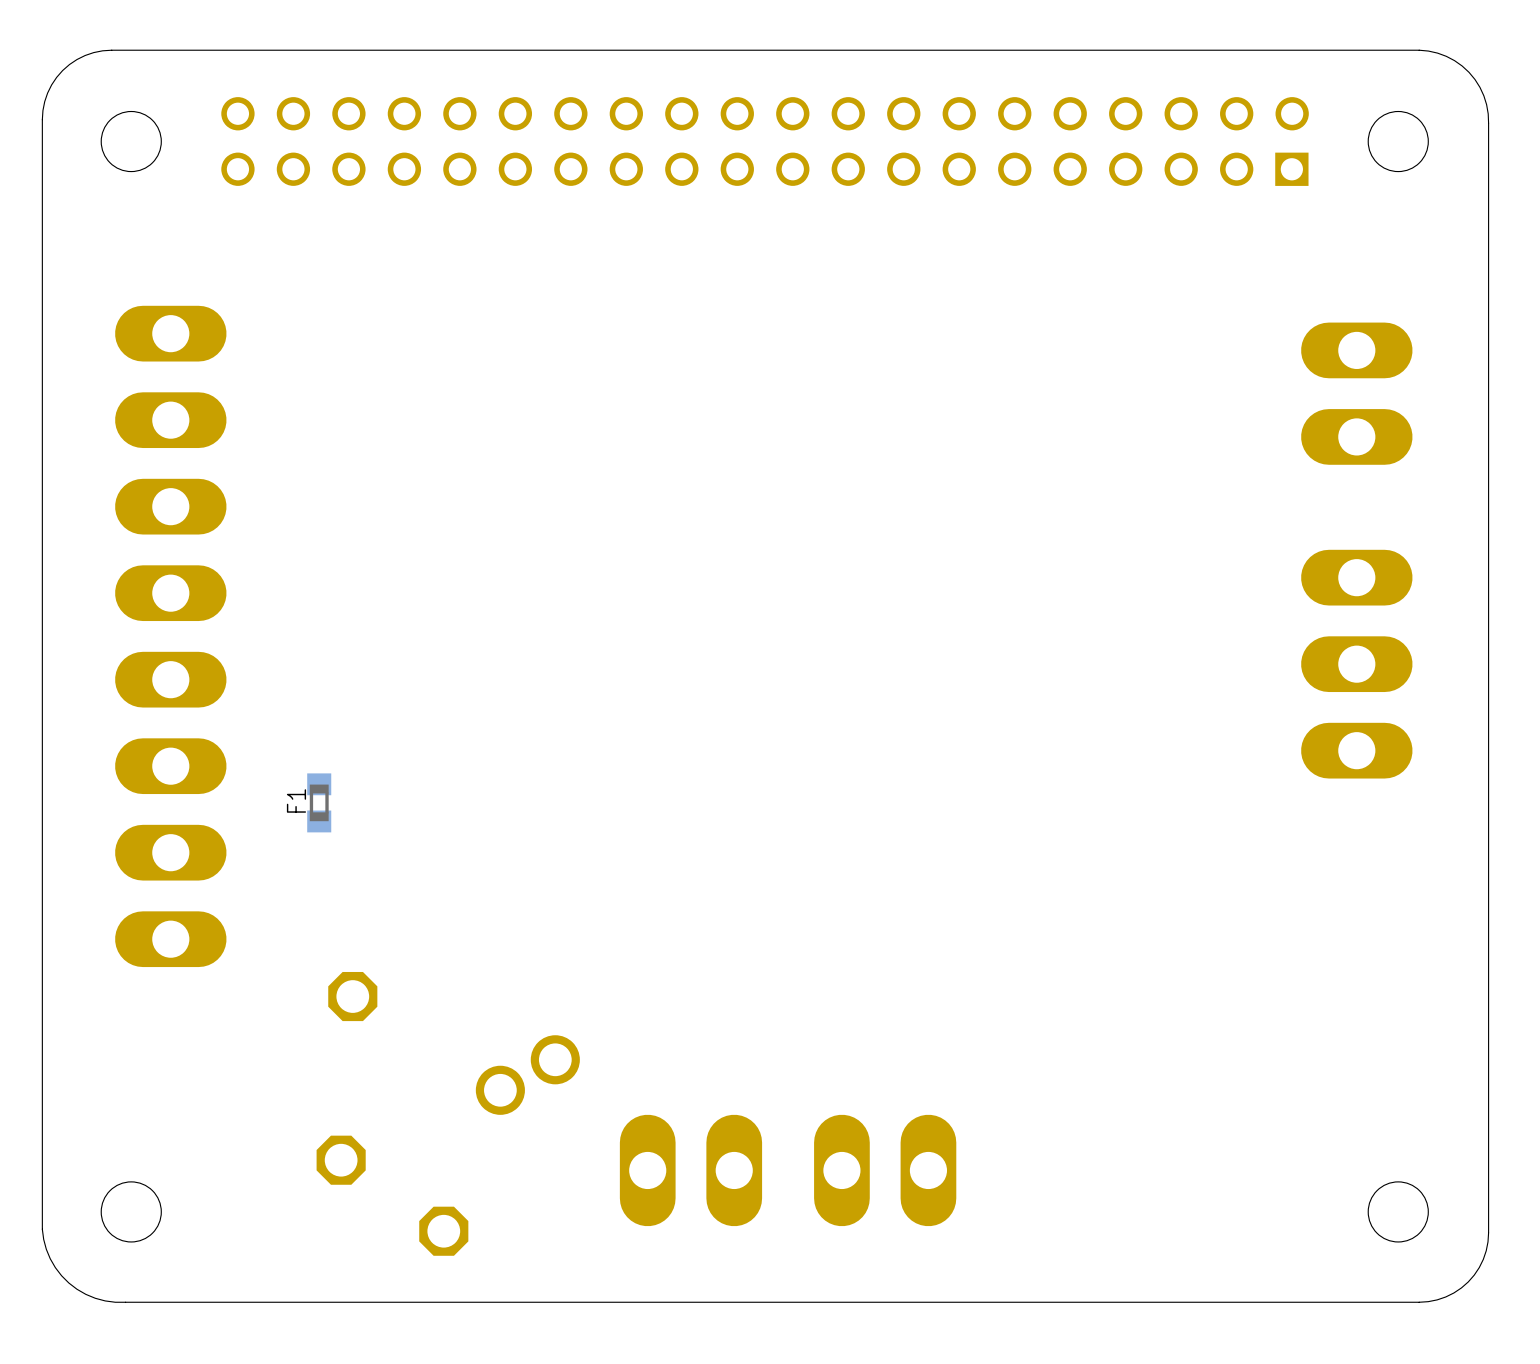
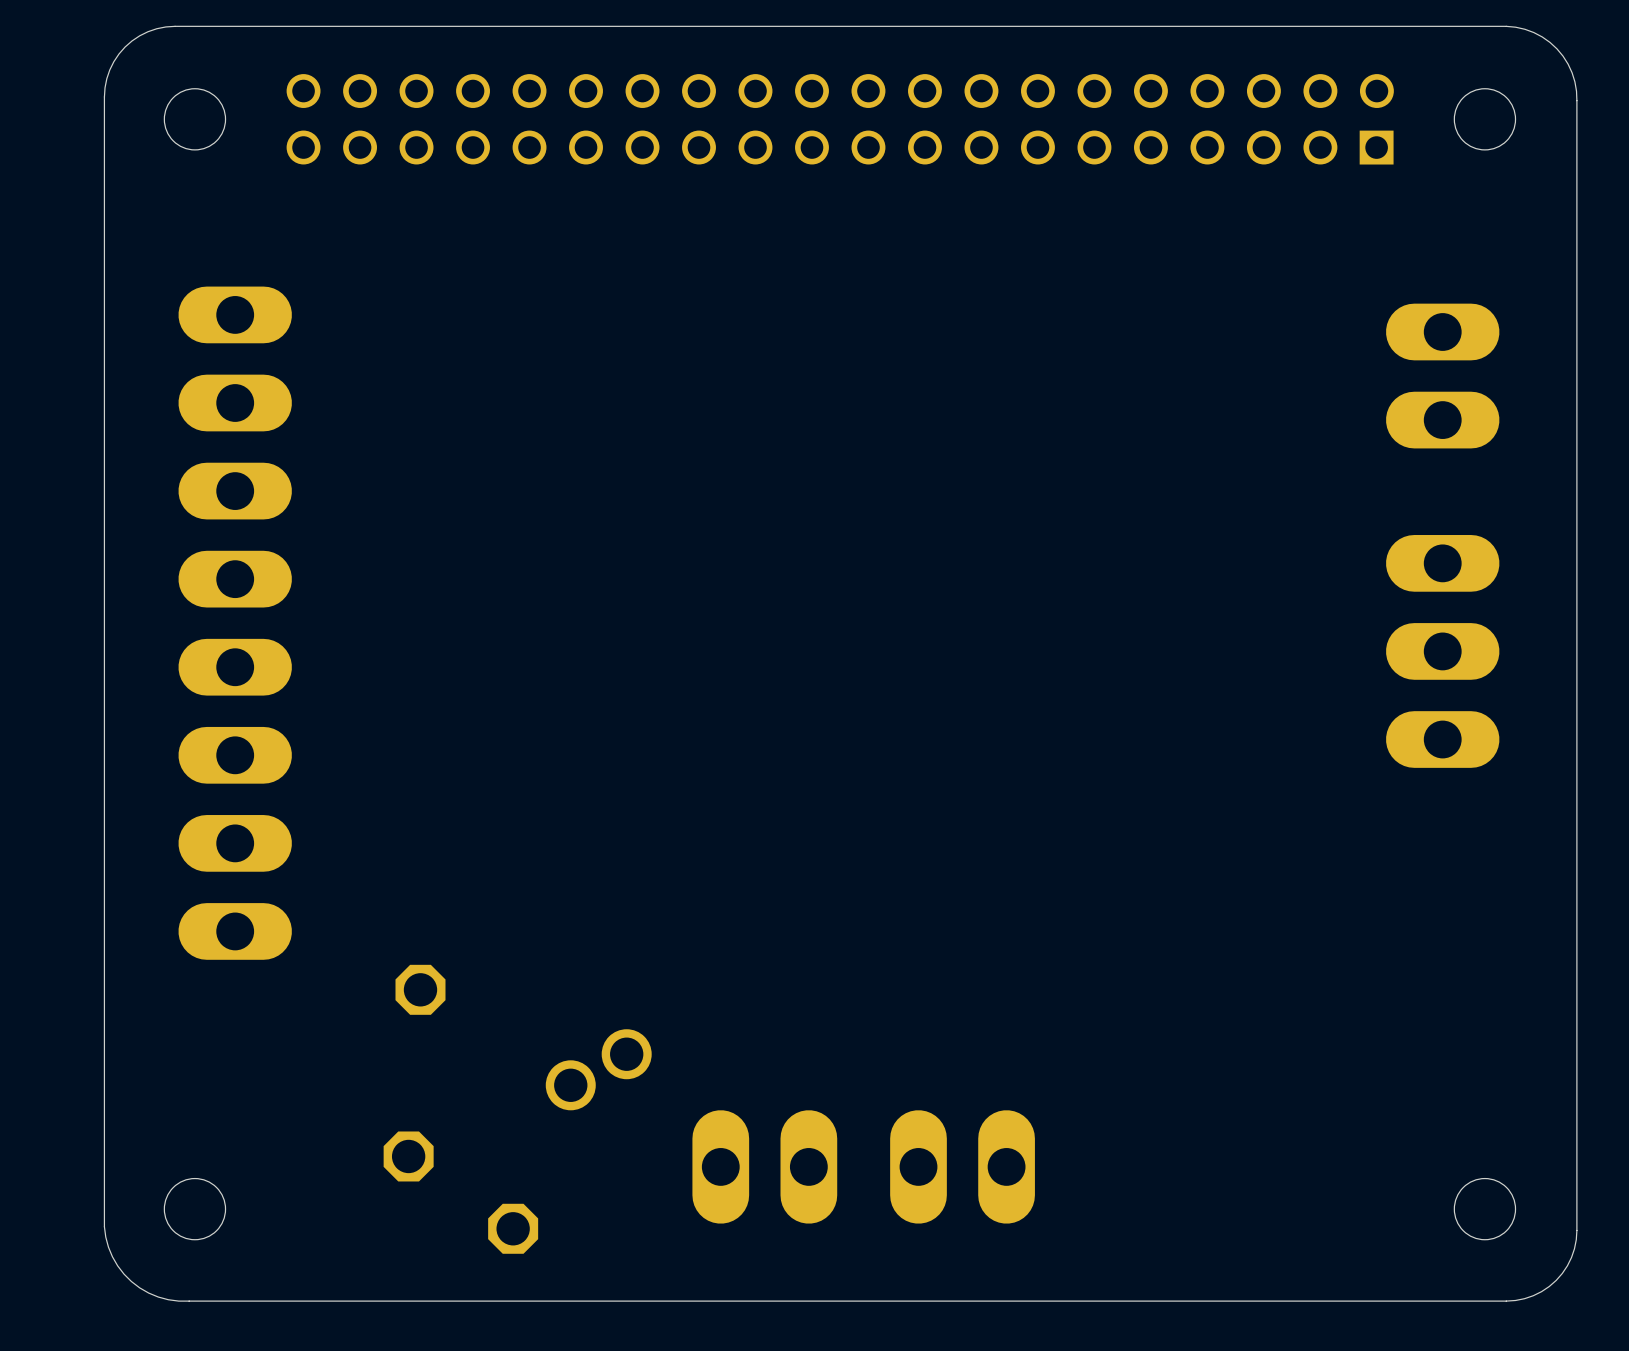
F1: (319, 802) -> none

